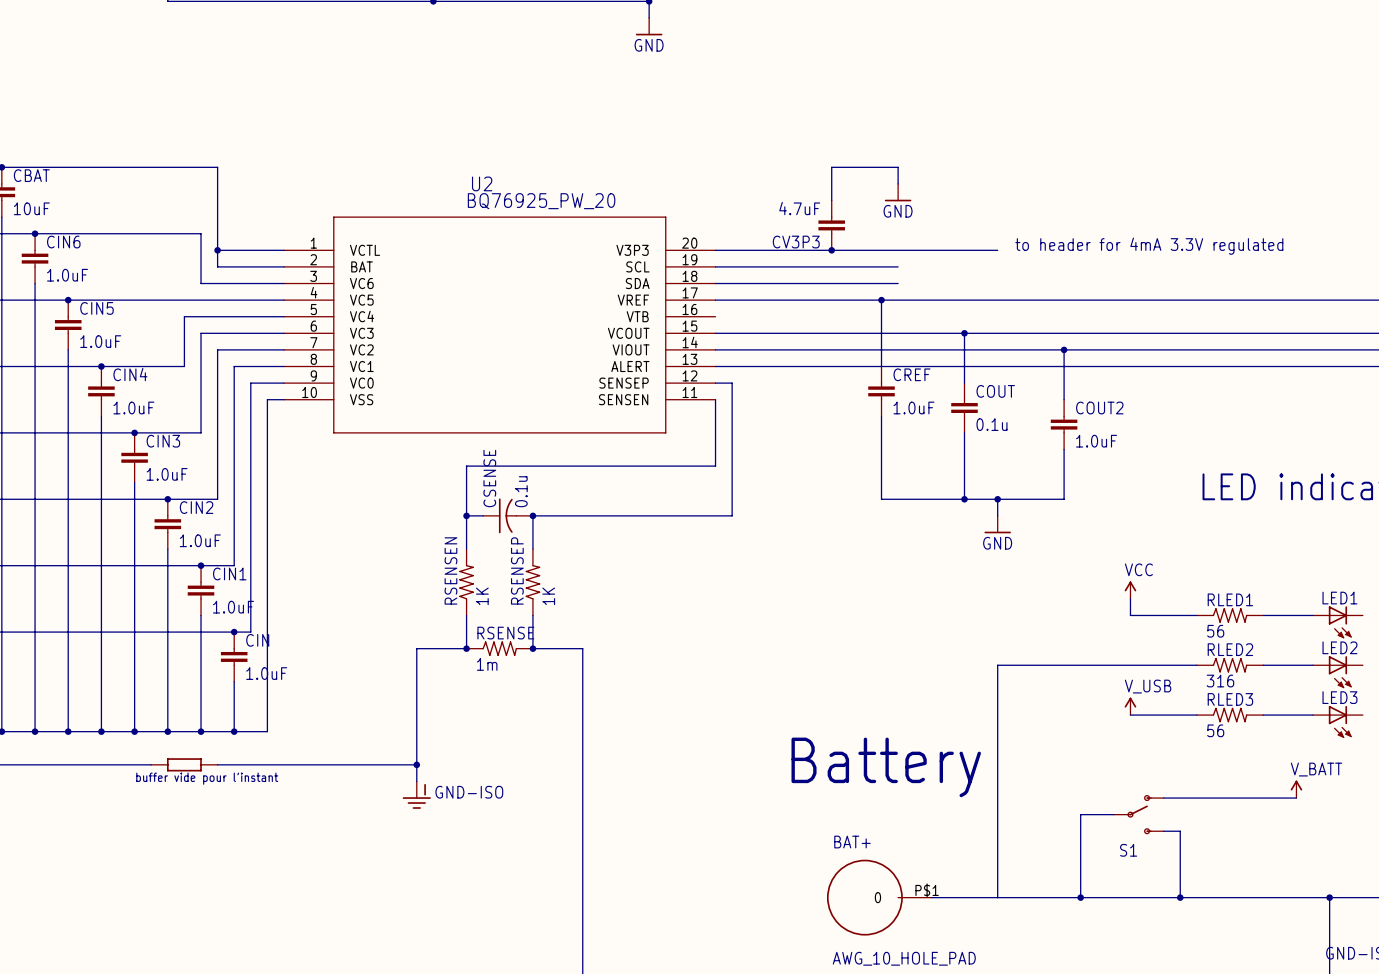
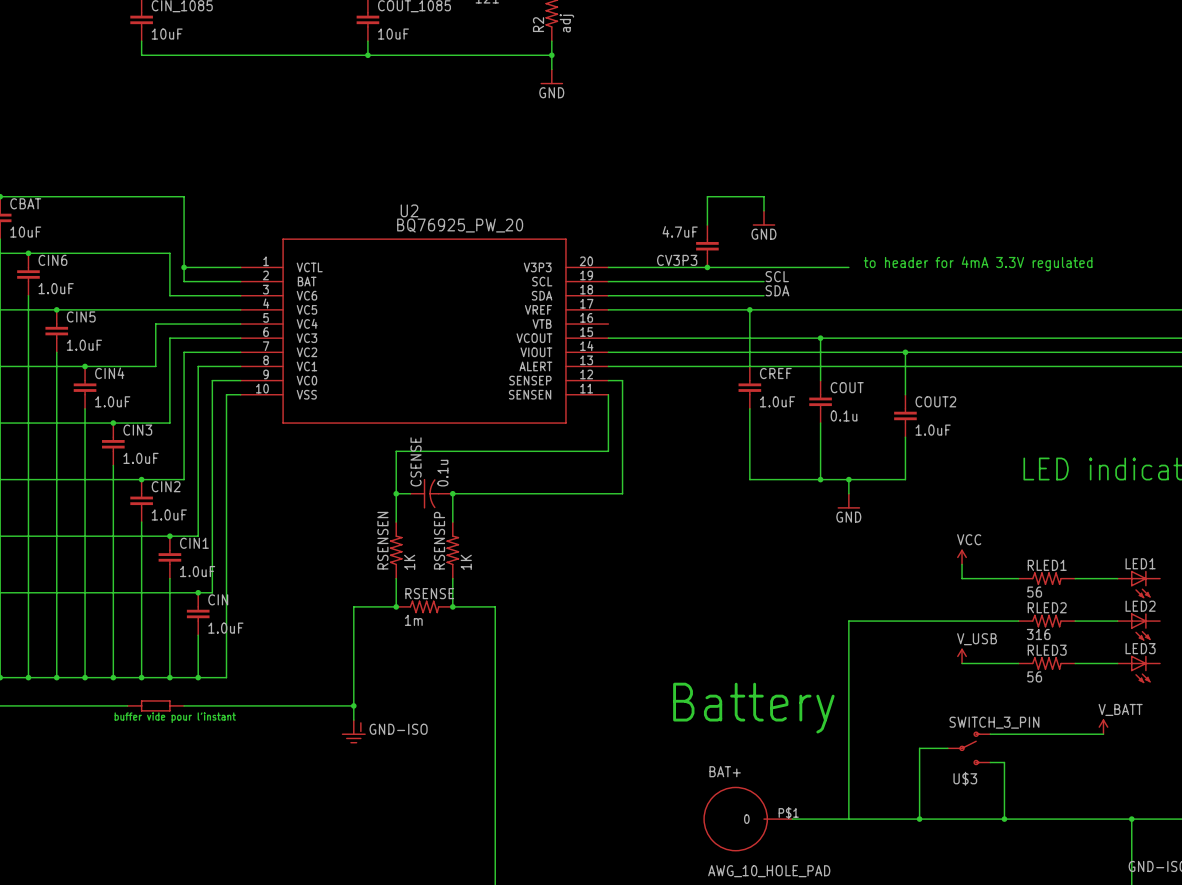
label: none -> SCL (777, 276)
label: none -> SDA (777, 290)
S1 value: none -> SWITCH_3_PIN (994, 722)
S1 name: S1 (1128, 850) -> U$3 (965, 778)

